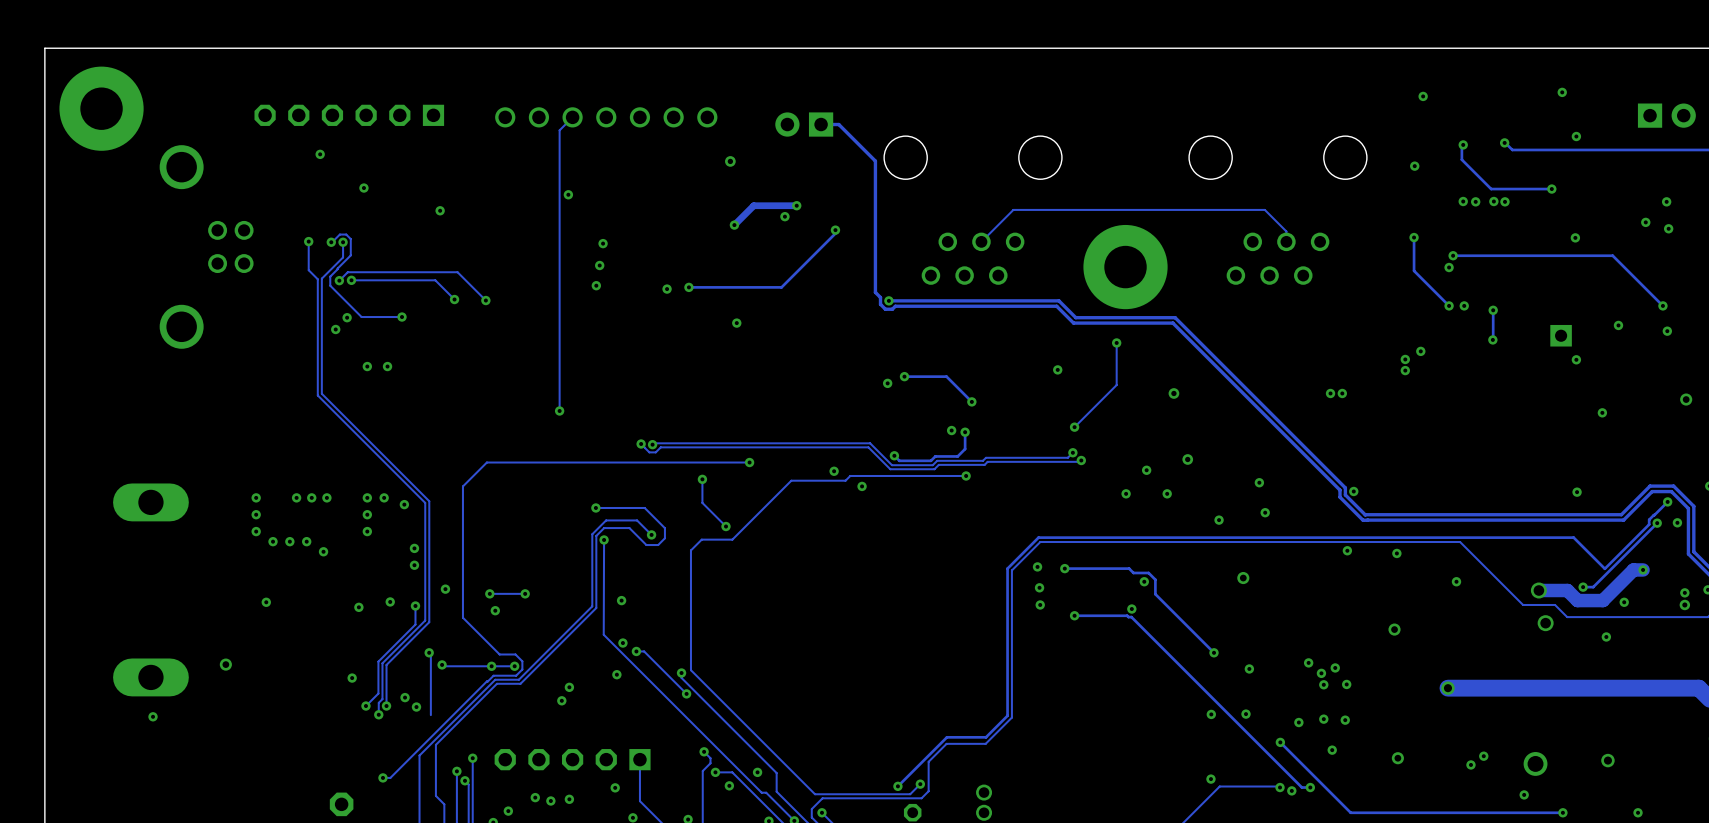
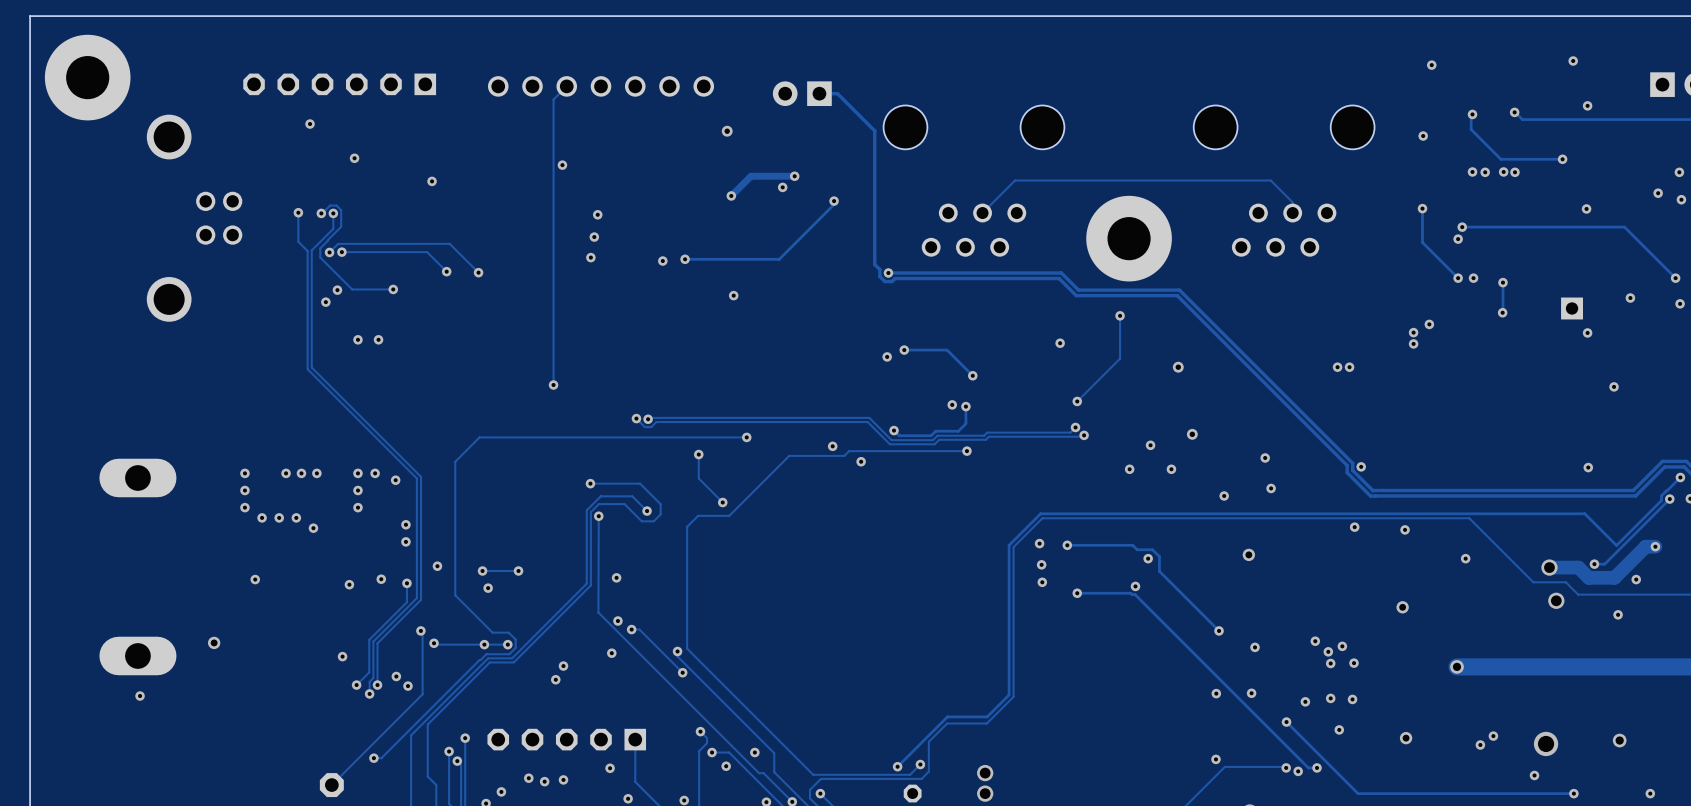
track: none -> (422, 694) (331, 785)

